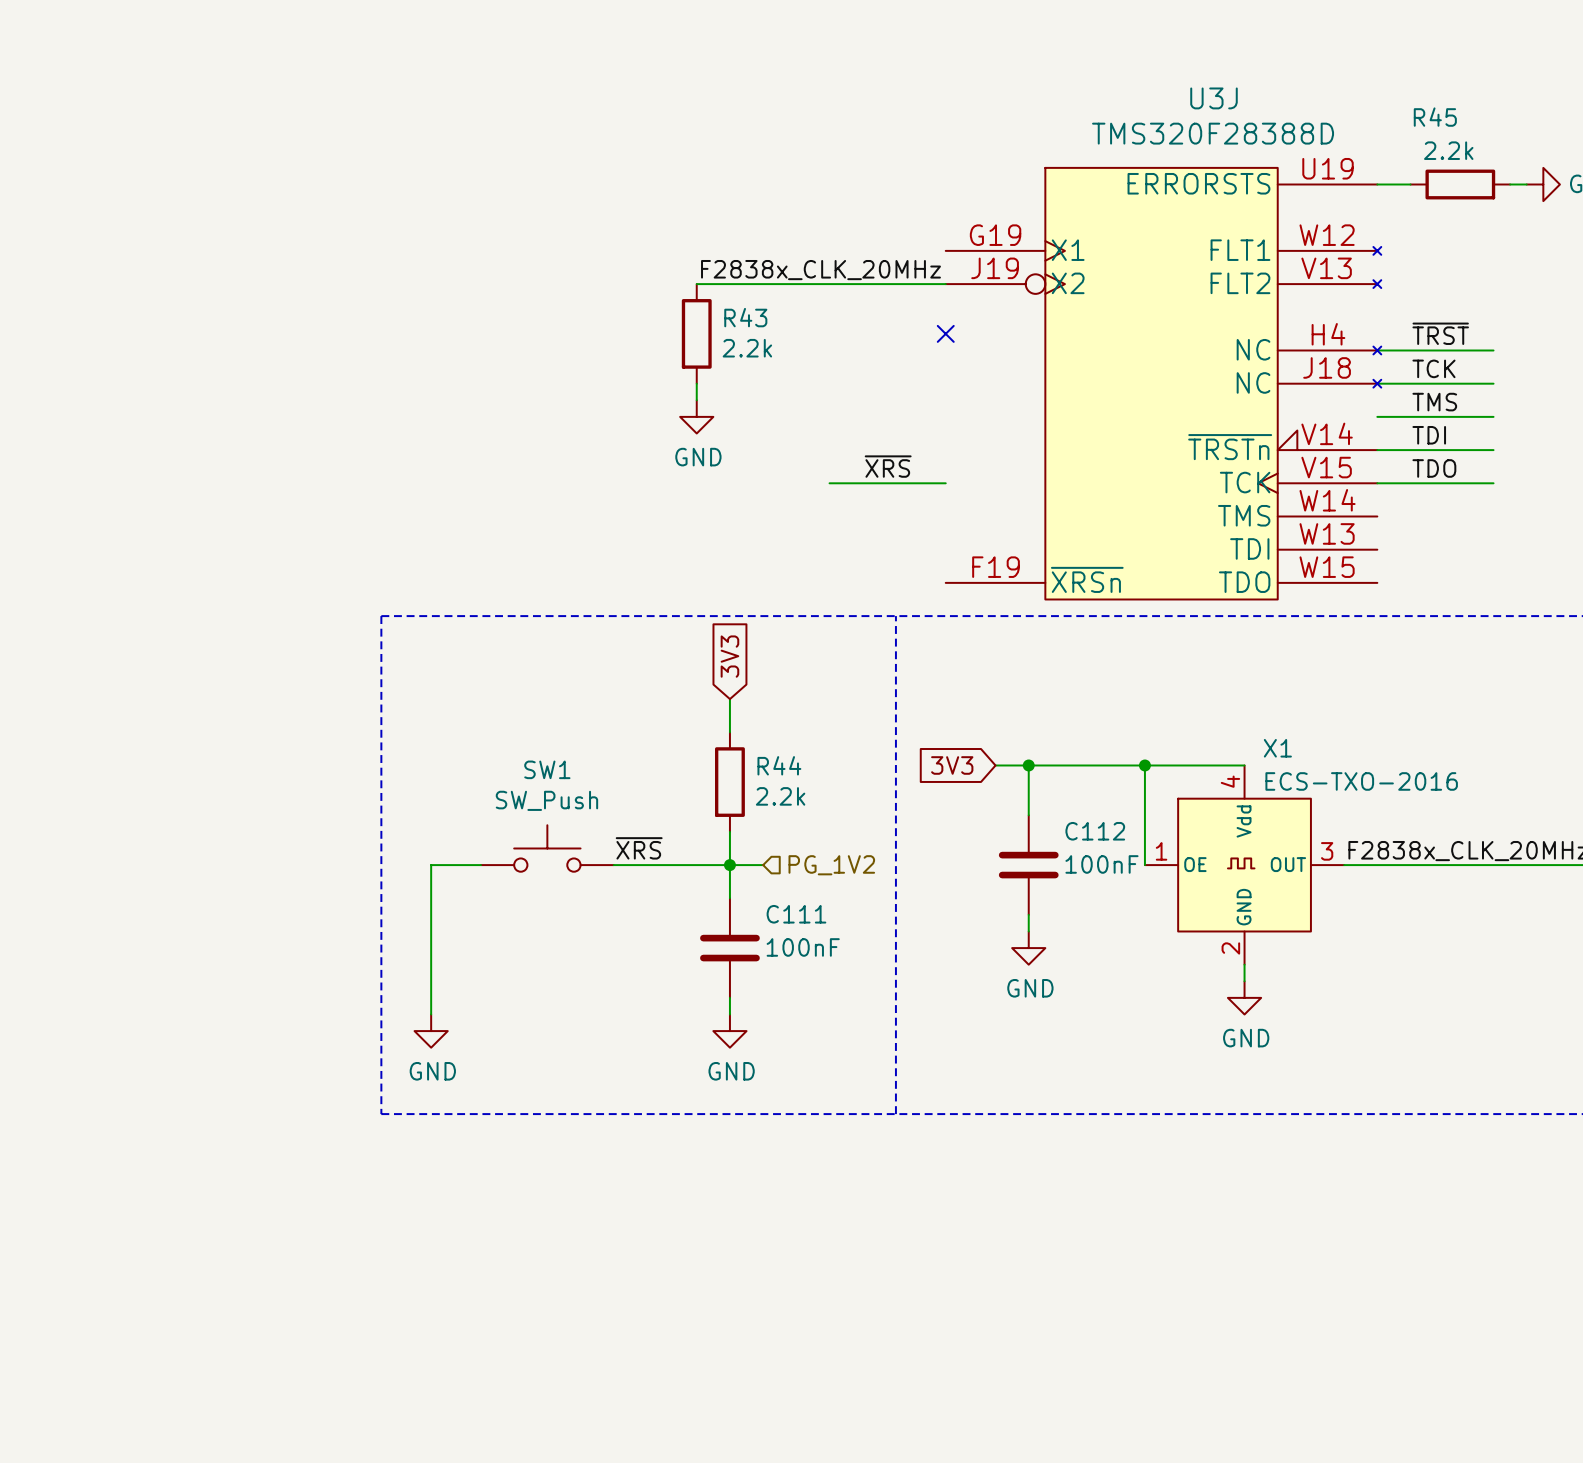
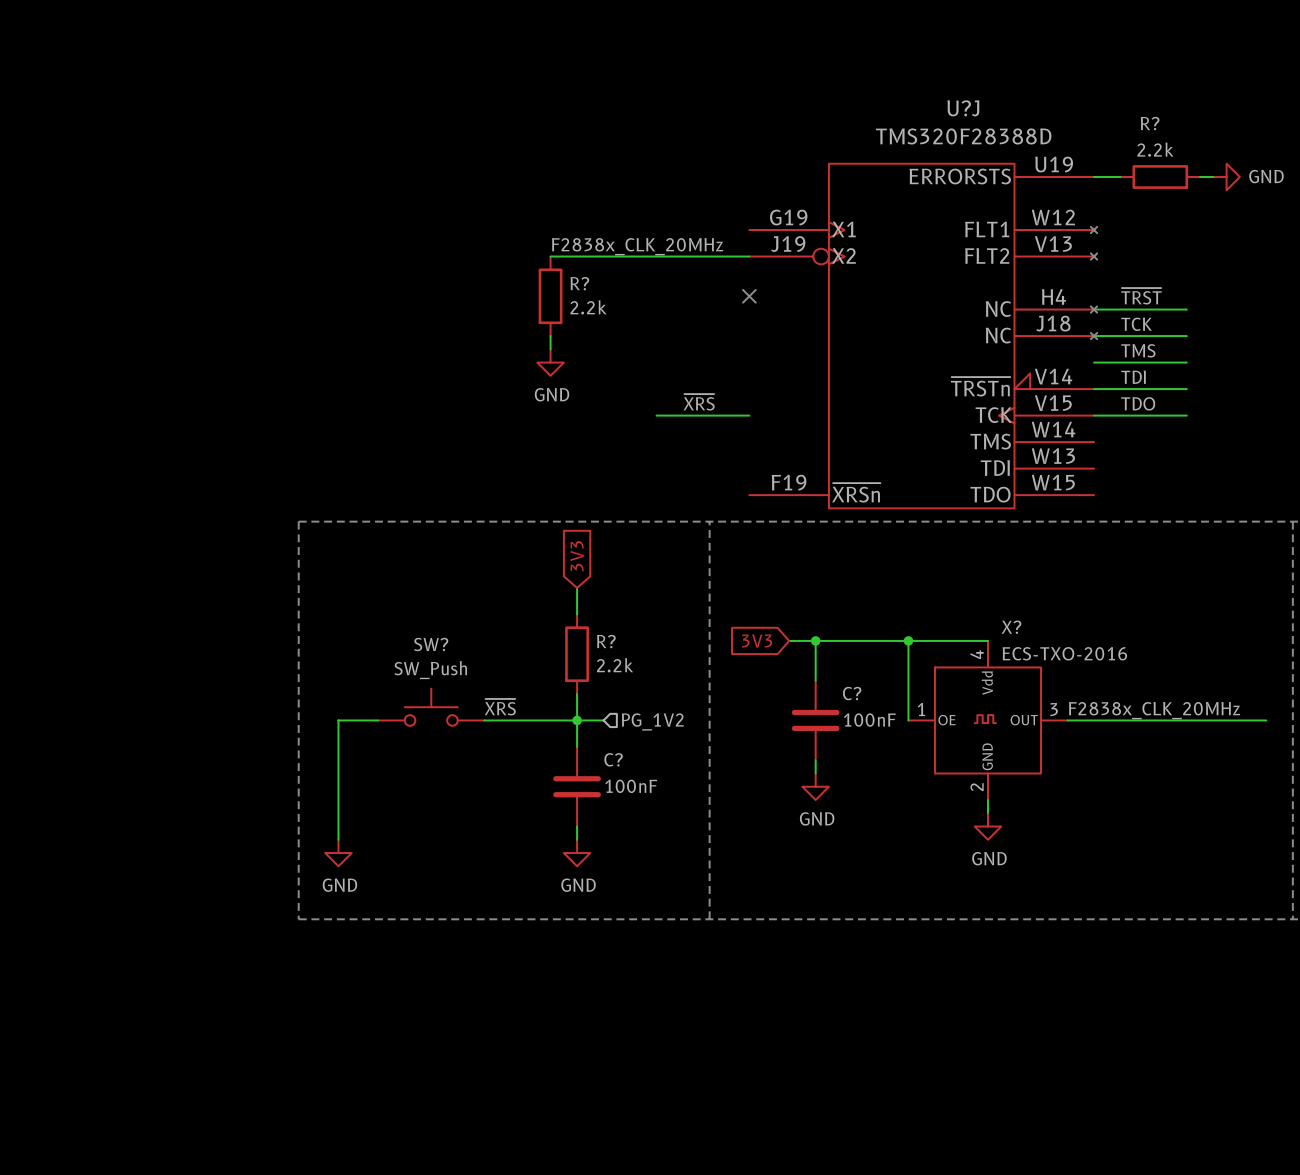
U3J name: U3J (1214, 98) -> U?J (963, 108)
R45 name: R45 (1435, 117) -> R? (1150, 123)
R43 name: R43 (745, 317) -> R? (579, 283)
X1 name: X1 (1277, 748) -> X? (1011, 627)
R44 name: R44 (779, 765) -> R? (606, 641)
SW1 name: SW1 (547, 769) -> SW? (431, 644)
C112 name: C112 (1095, 831) -> C? (852, 693)
C111 name: C111 (796, 914) -> C? (613, 759)

